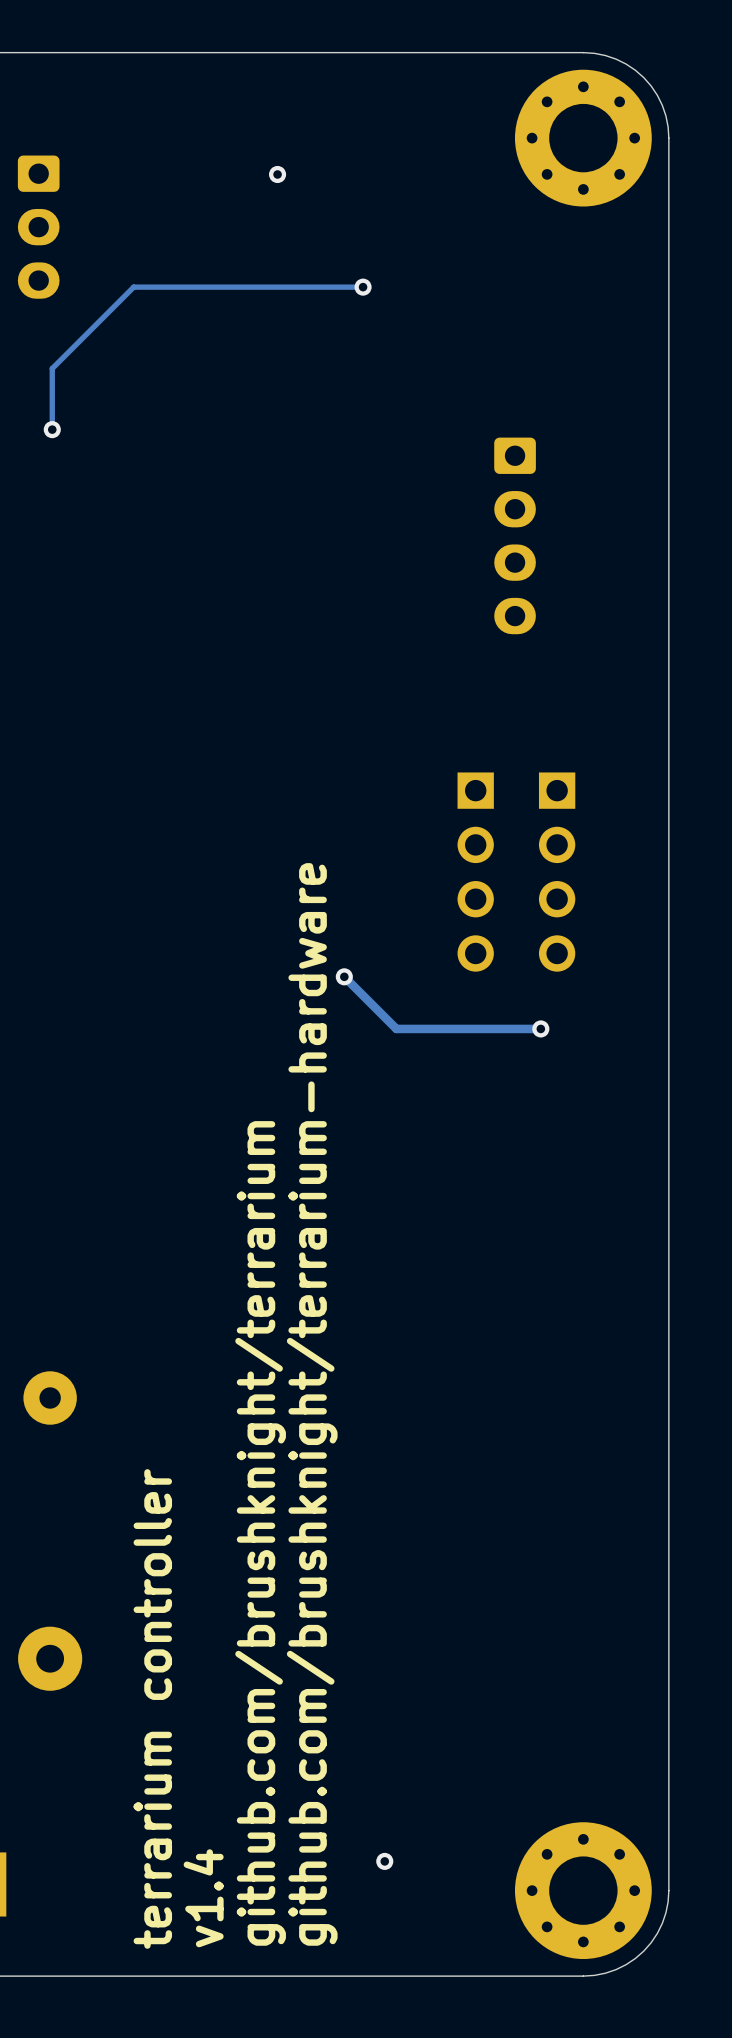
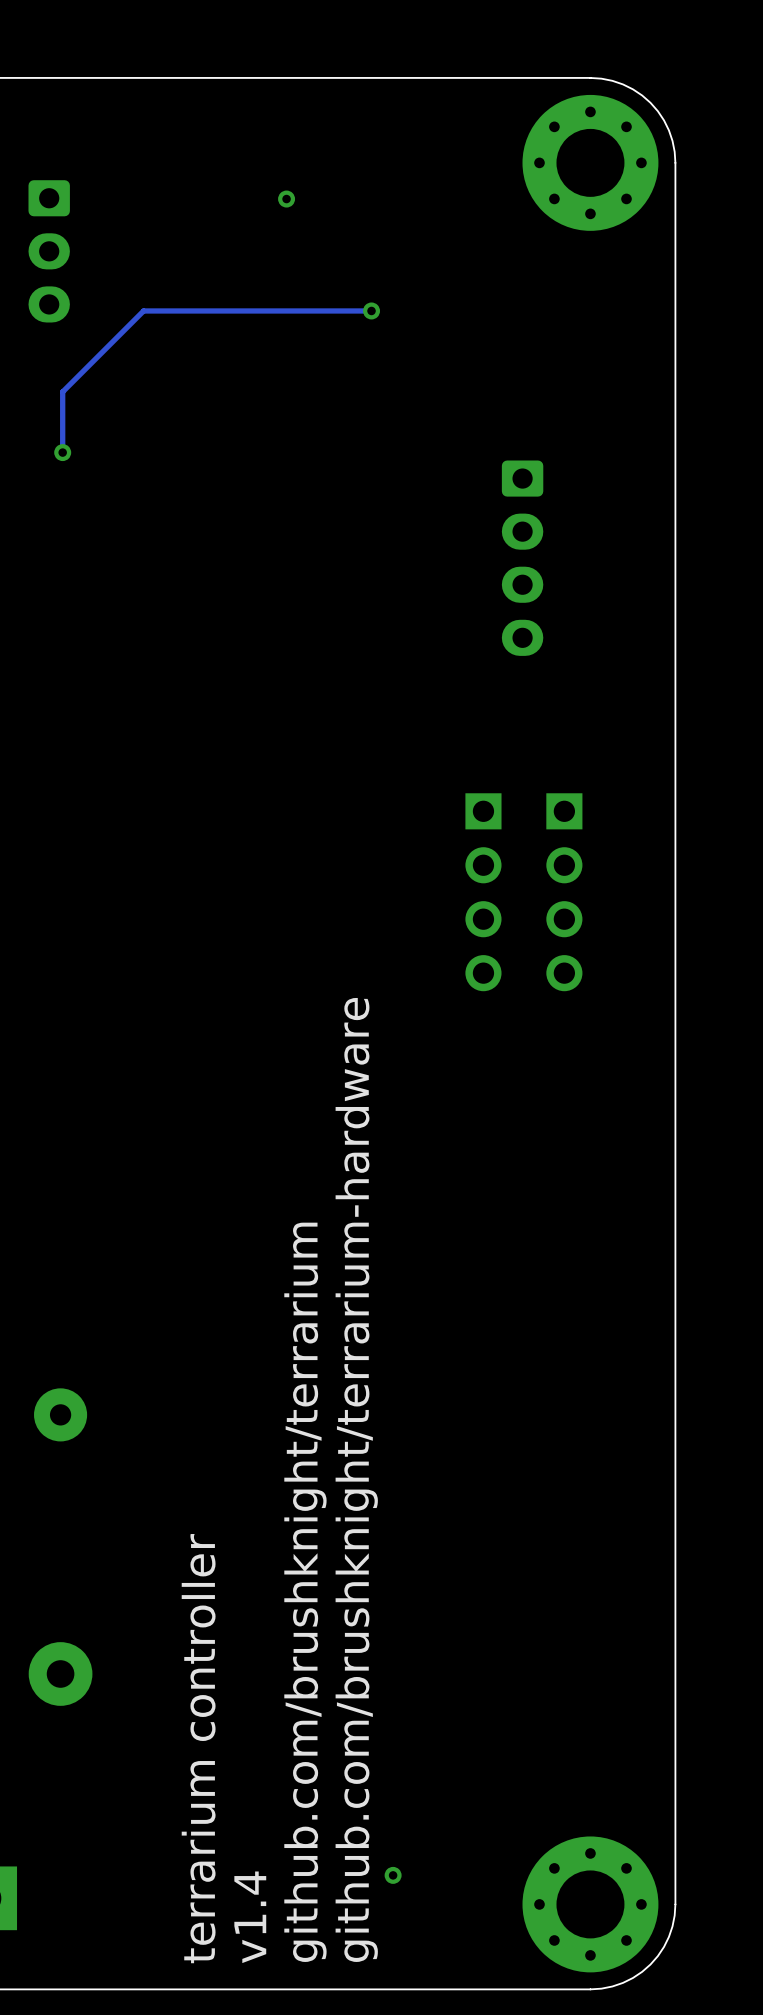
track: (344, 976) (396, 1028) (540, 1028) -> none
via: (344, 976) -> none
via: (540, 1028) -> none
text: none -> github.com/brushknight/terrarium-hardware (356, 1479)
text: github.com/brushknight/terrarium-hardware (312, 1404) -> github.com/brushknight/terrarium (305, 1592)
text: github.com/brushknight/terrarium (260, 1533) -> v1.4 (250, 1917)
text: terrarium controller (152, 1708) -> none
text: v1.4 (203, 1898) -> terrarium controller (198, 1748)

